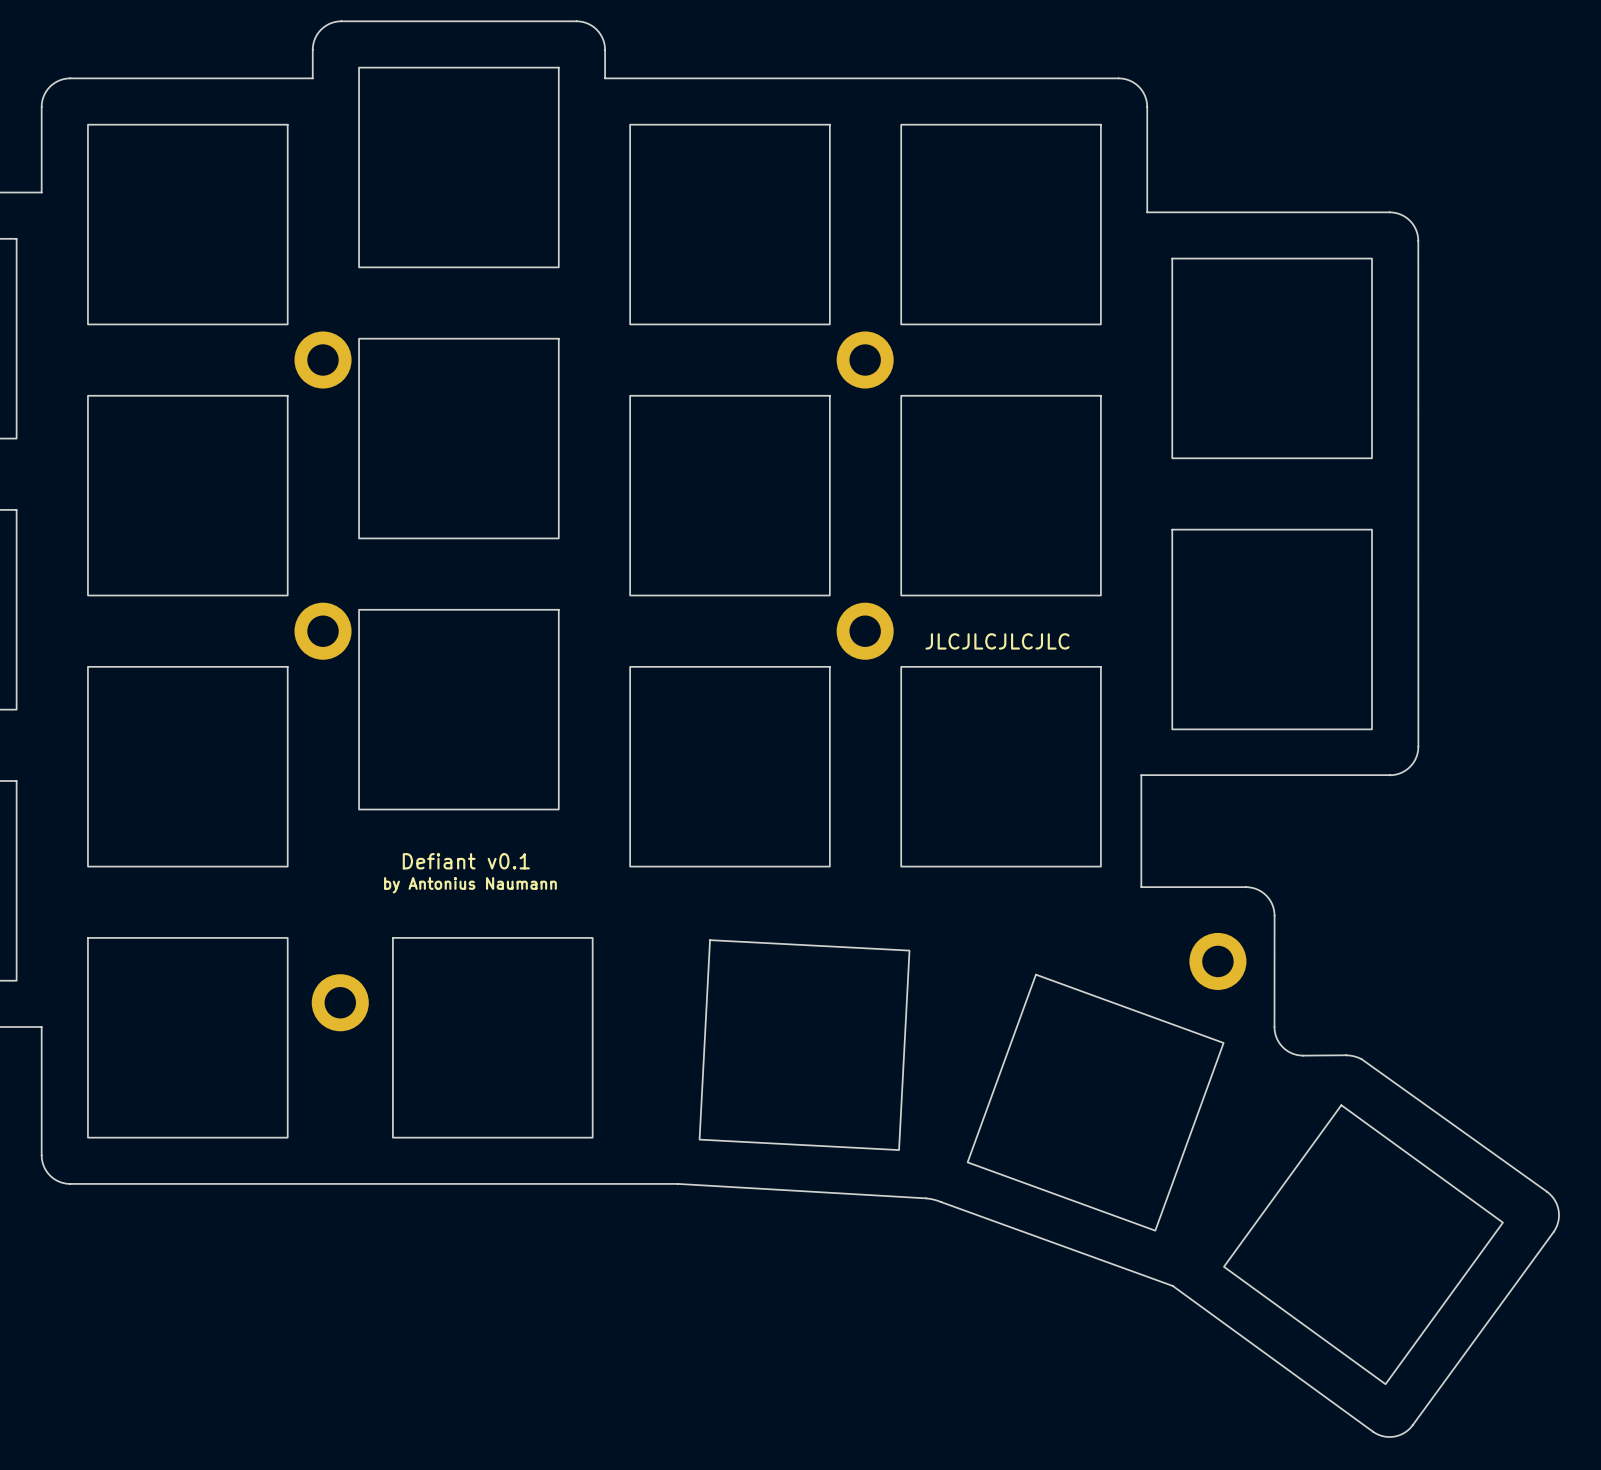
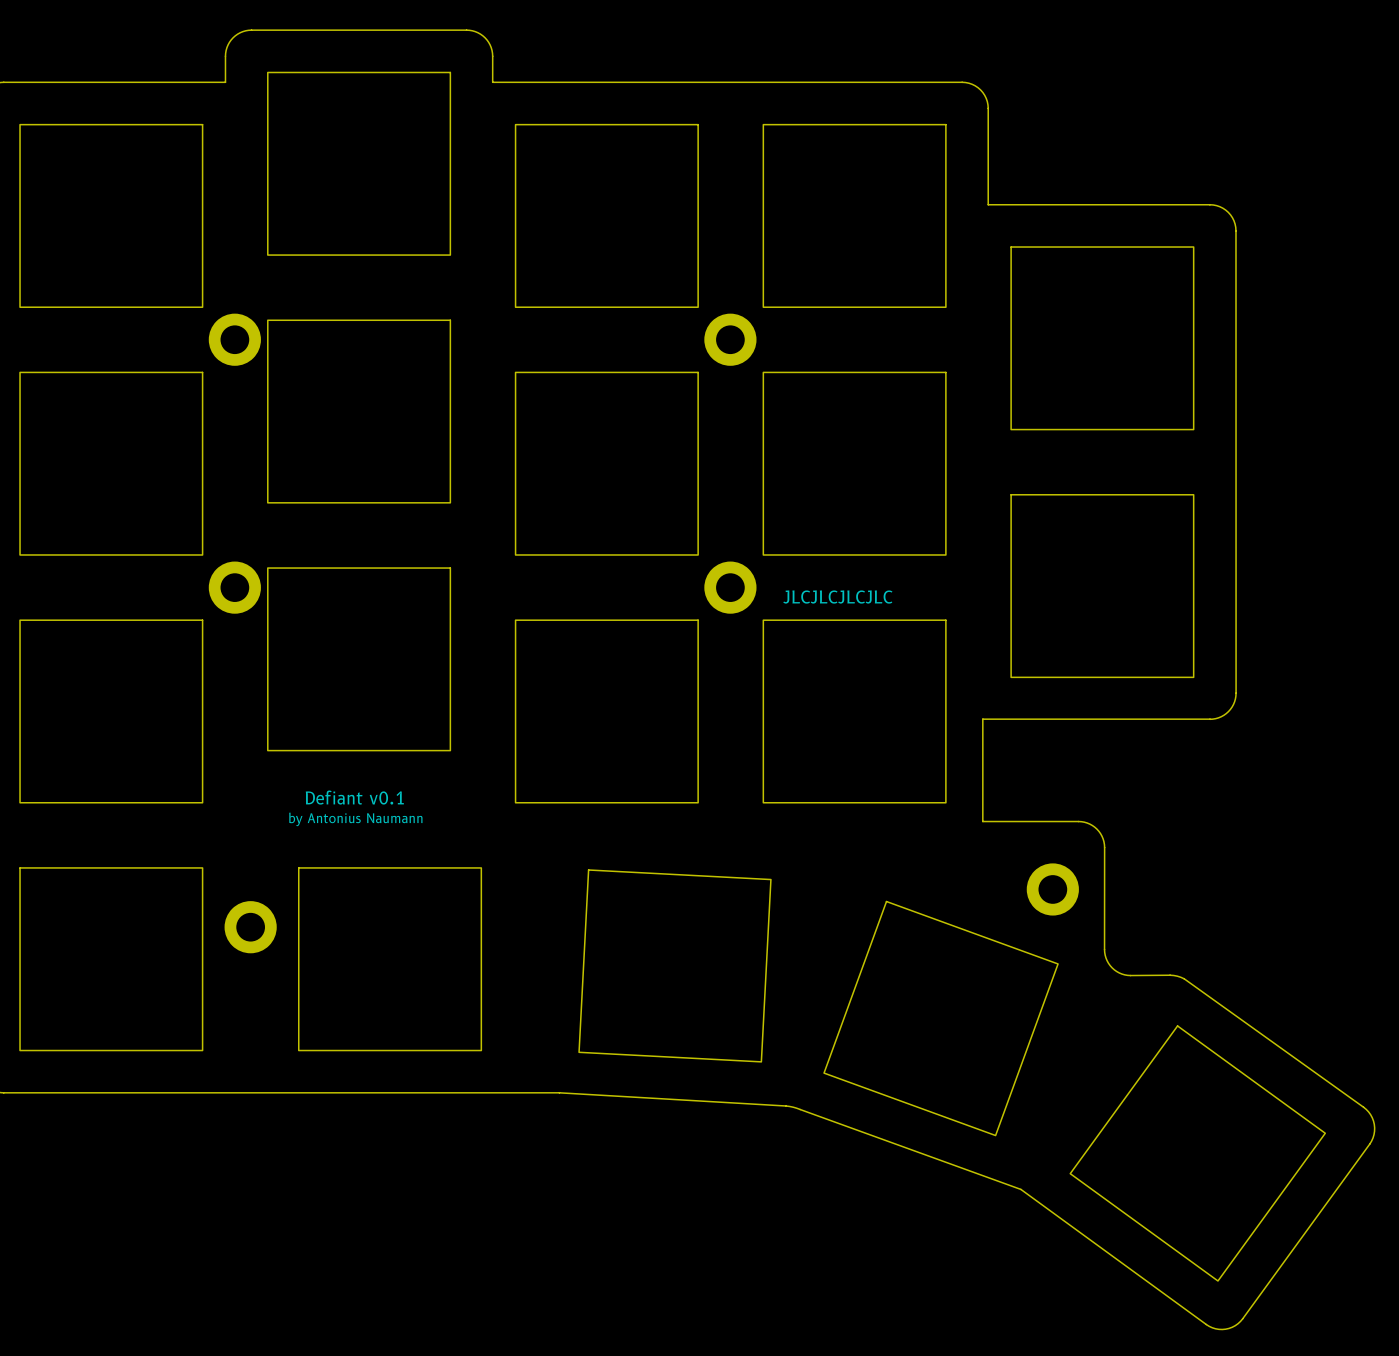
board edge: (1361, 1059) (1546, 1191) (1554, 1199) (1558, 1210) (1558, 1221) (1553, 1232) (1412, 1425) (1400, 1434) (1387, 1436) (1372, 1431) (1172, 1285) (941, 1202) -> (1184, 978) (1363, 1107) (1370, 1114) (1374, 1124) (1374, 1134) (1369, 1144) (1242, 1318) (1229, 1328) (1218, 1329) (1206, 1324) (1020, 1189) (800, 1109)
drawing position: (1363, 1244) -> (1197, 1153)

